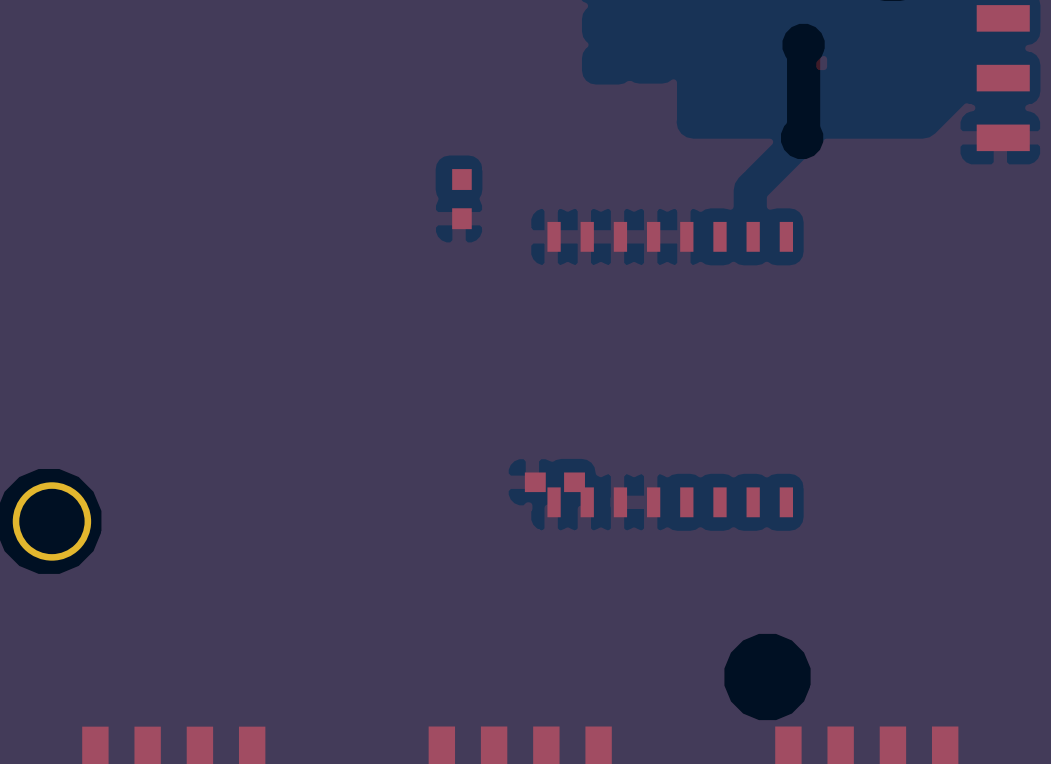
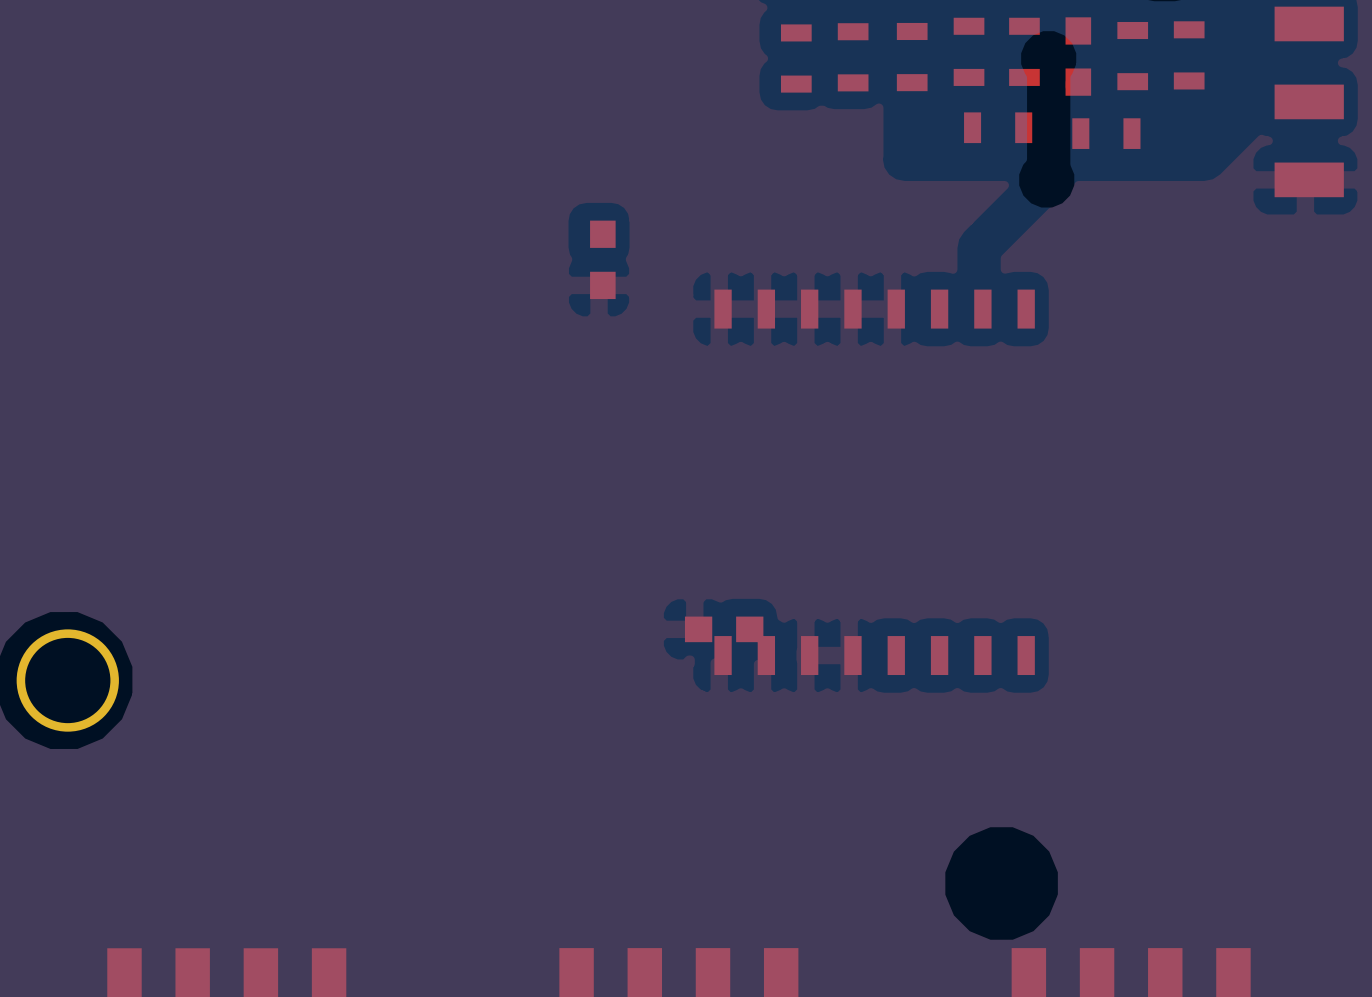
part: none -> (969, 51)
part: none -> (1024, 51)
part: none -> (1132, 56)
part: none -> (1189, 55)
part: none -> (853, 57)
part: none -> (912, 57)
part: none -> (1078, 56)
part: none -> (796, 58)
part: none -> (998, 127)
part: none -> (1106, 133)

